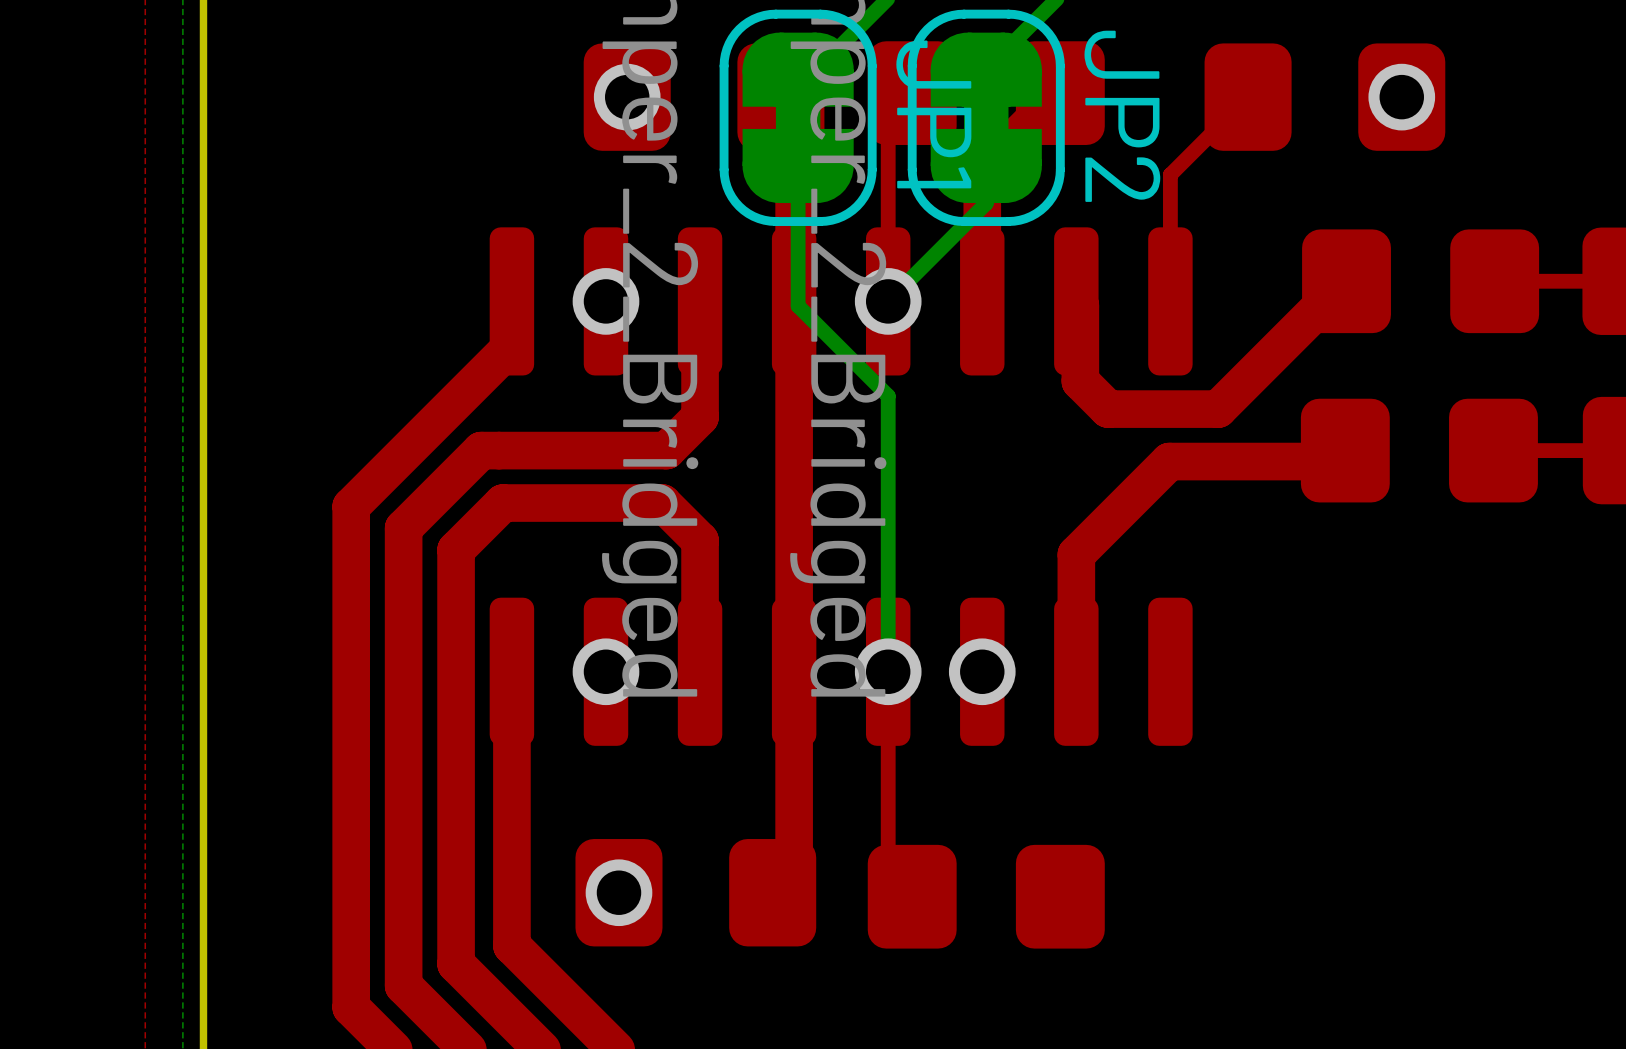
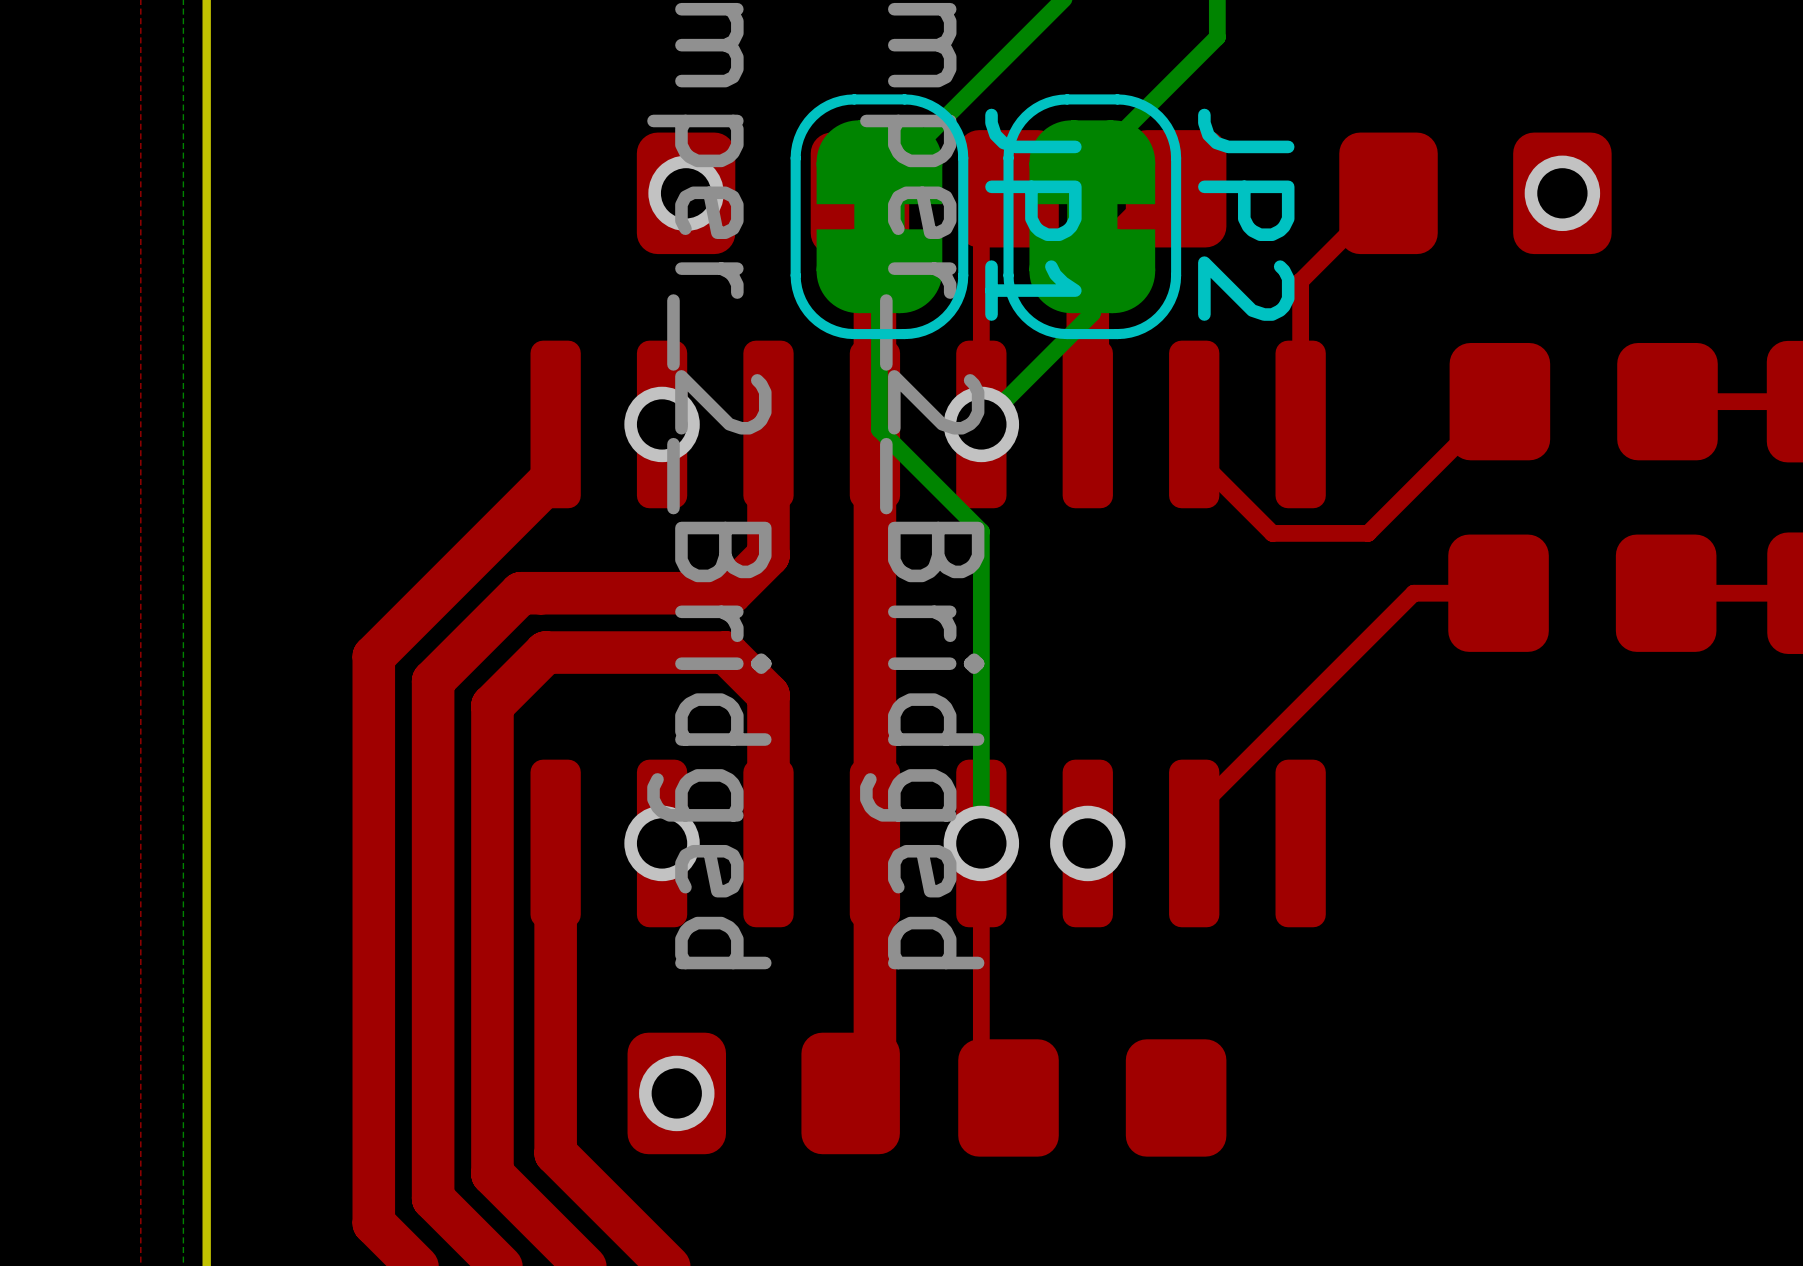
top track: (1348, 279) (1218, 409) (1108, 409) (1080, 381) (1080, 305) (1076, 301) -> (1499, 401) (1368, 533) (1272, 533) (1194, 455)
top track: none -> (1498, 593) (1413, 593) (1194, 812)
top track: (1334, 461) (1169, 461) (1076, 554) (1076, 671) -> none

